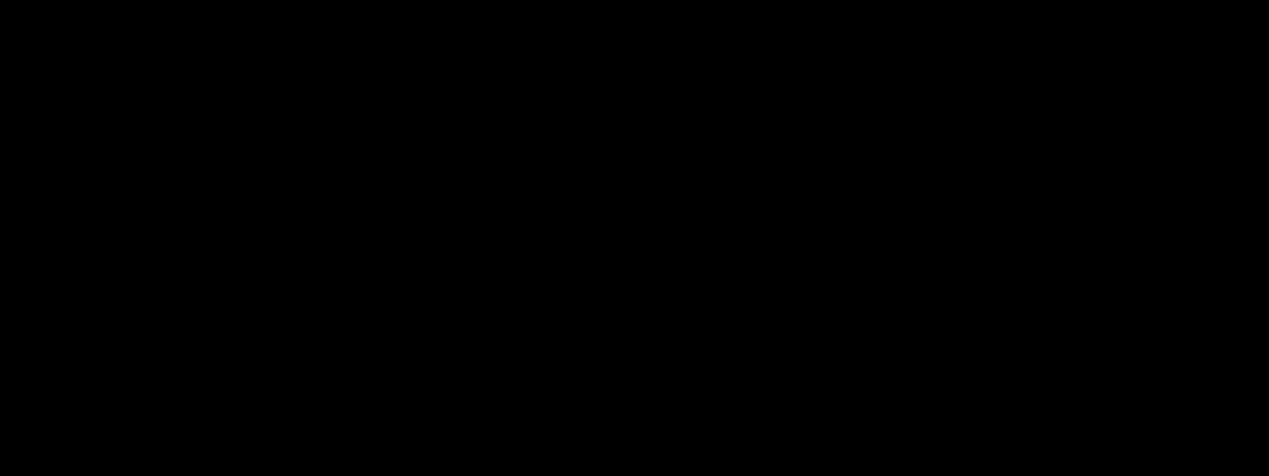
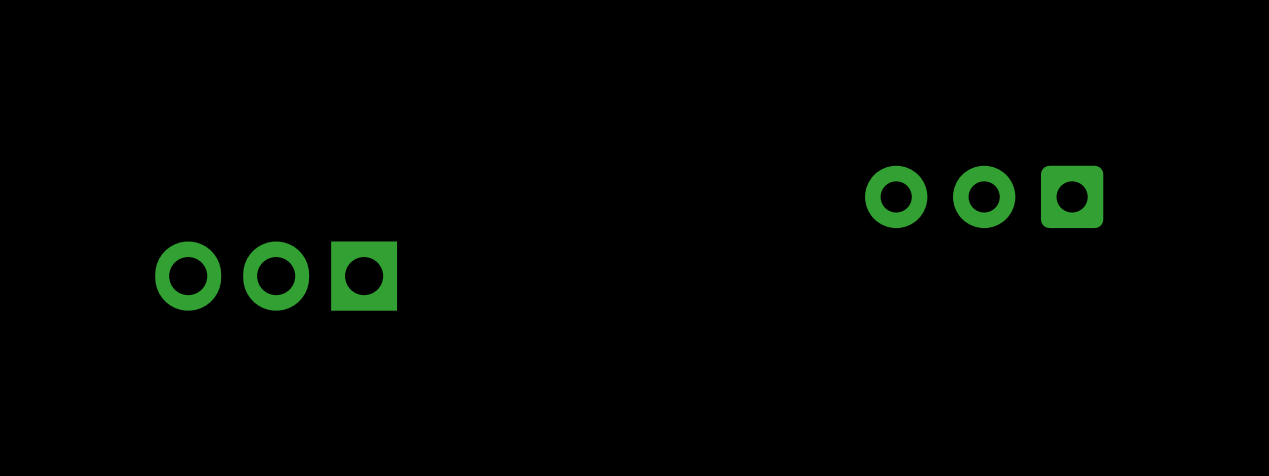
part: none -> (984, 196)
part: none -> (276, 276)

